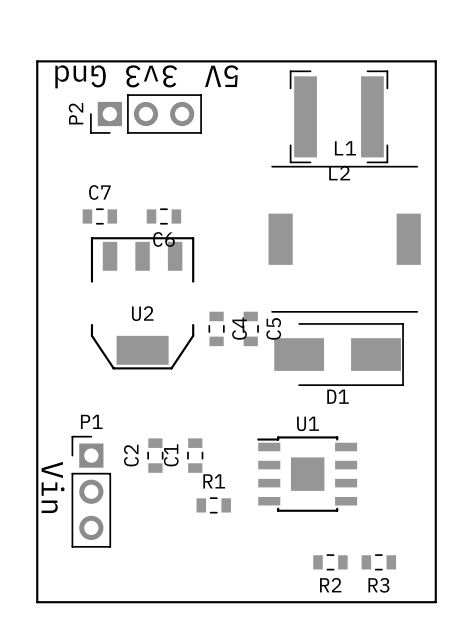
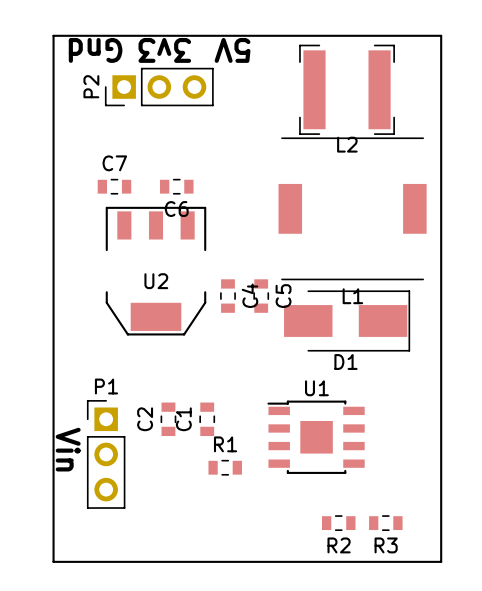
L1 name position: L1 (345, 148) -> L1 (352, 296)

